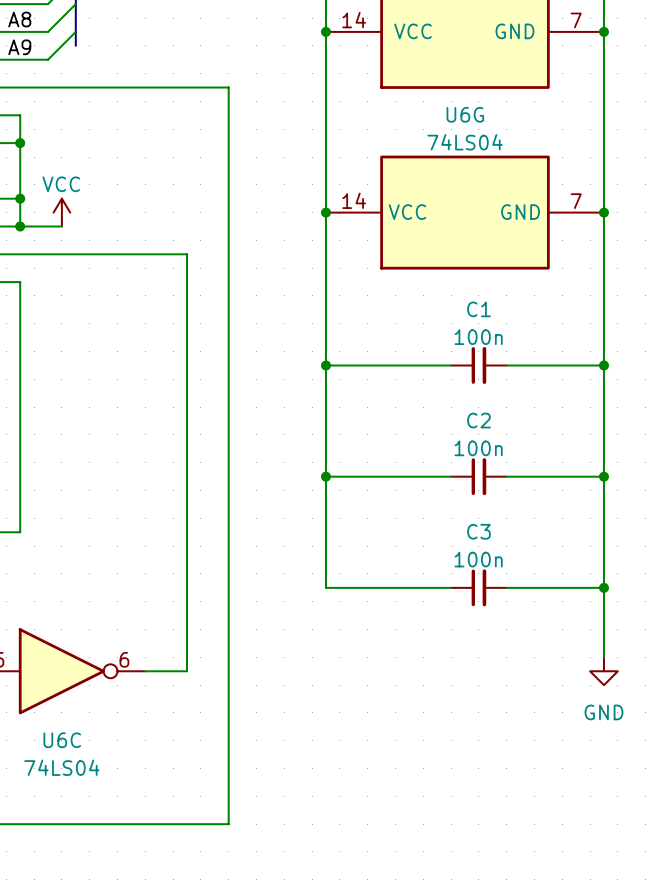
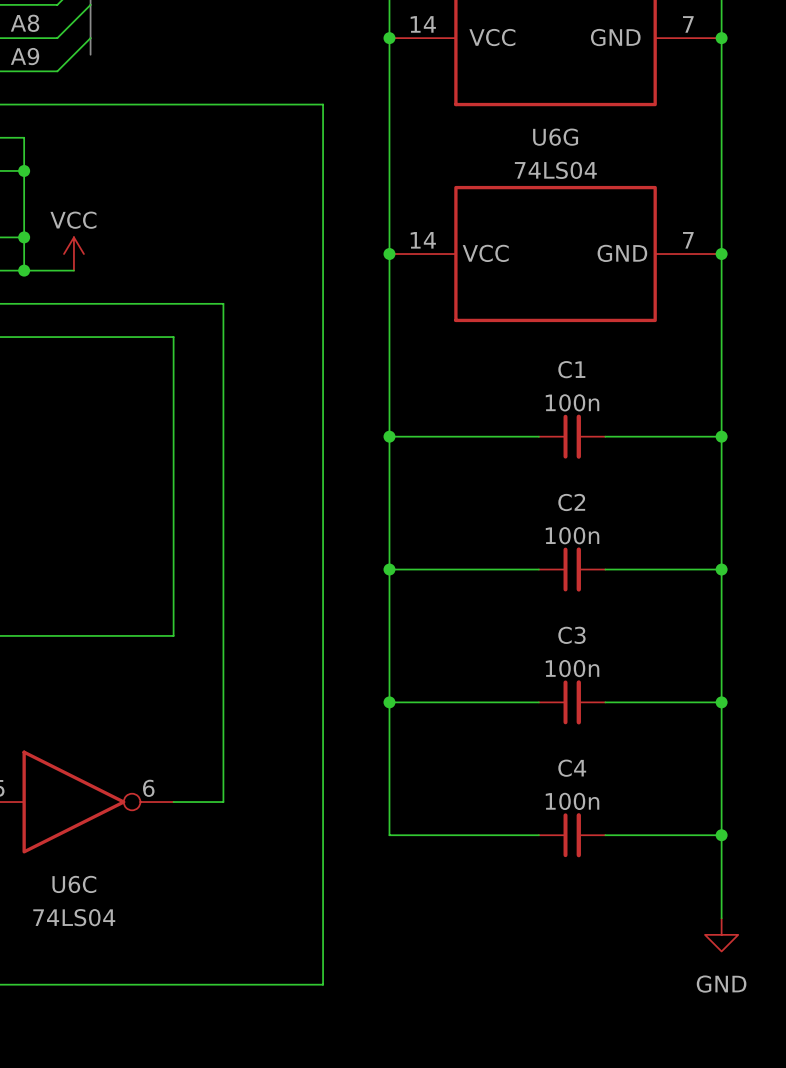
wire: (228, 87) (228, 824) -> (273, 104) (323, 104) (323, 984) (273, 984)
wire: (20, 282) (20, 532) -> (24, 337) (173, 337) (173, 635) (24, 635)
wire: none -> (389, 702) (389, 835) (538, 835)
junction: none -> (389, 702)
wire: none -> (721, 785) (721, 918)
power symbol position: GND (603, 671) -> GND (721, 934)
C4: none -> 100n (572, 835)
wire: none -> (605, 835) (721, 835)
junction: none -> (721, 835)

